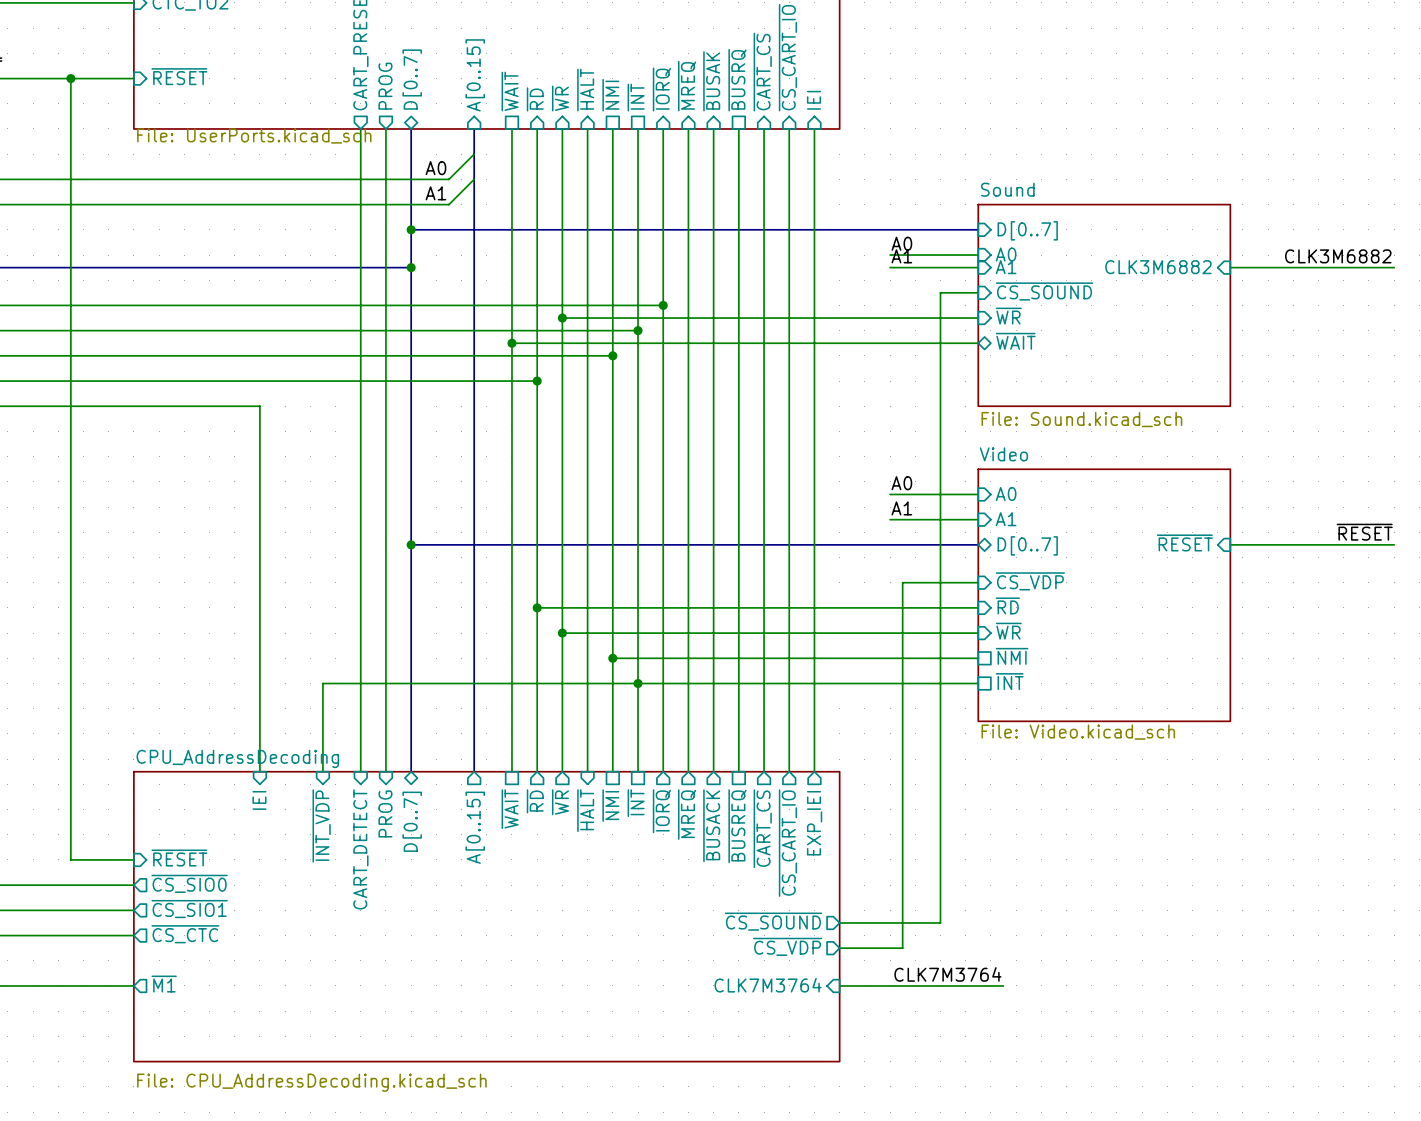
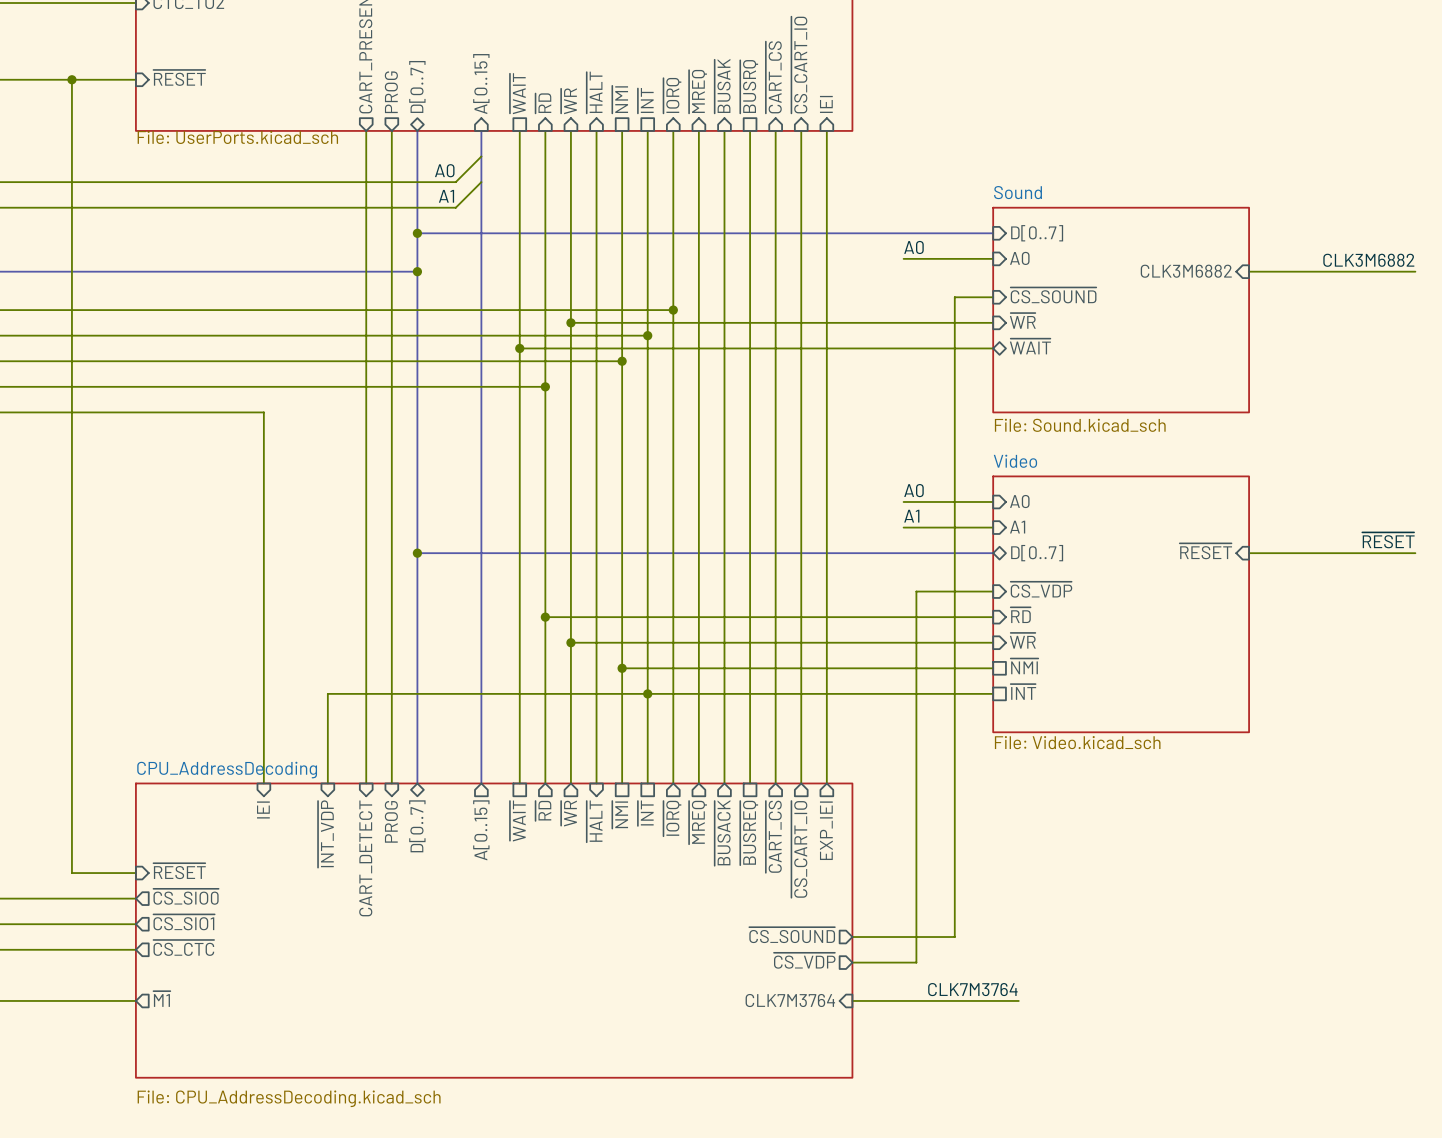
label: A1 (901, 256) -> none
wire: (890, 267) (978, 267) -> none
sheet pin: A1 (1006, 267) -> none

